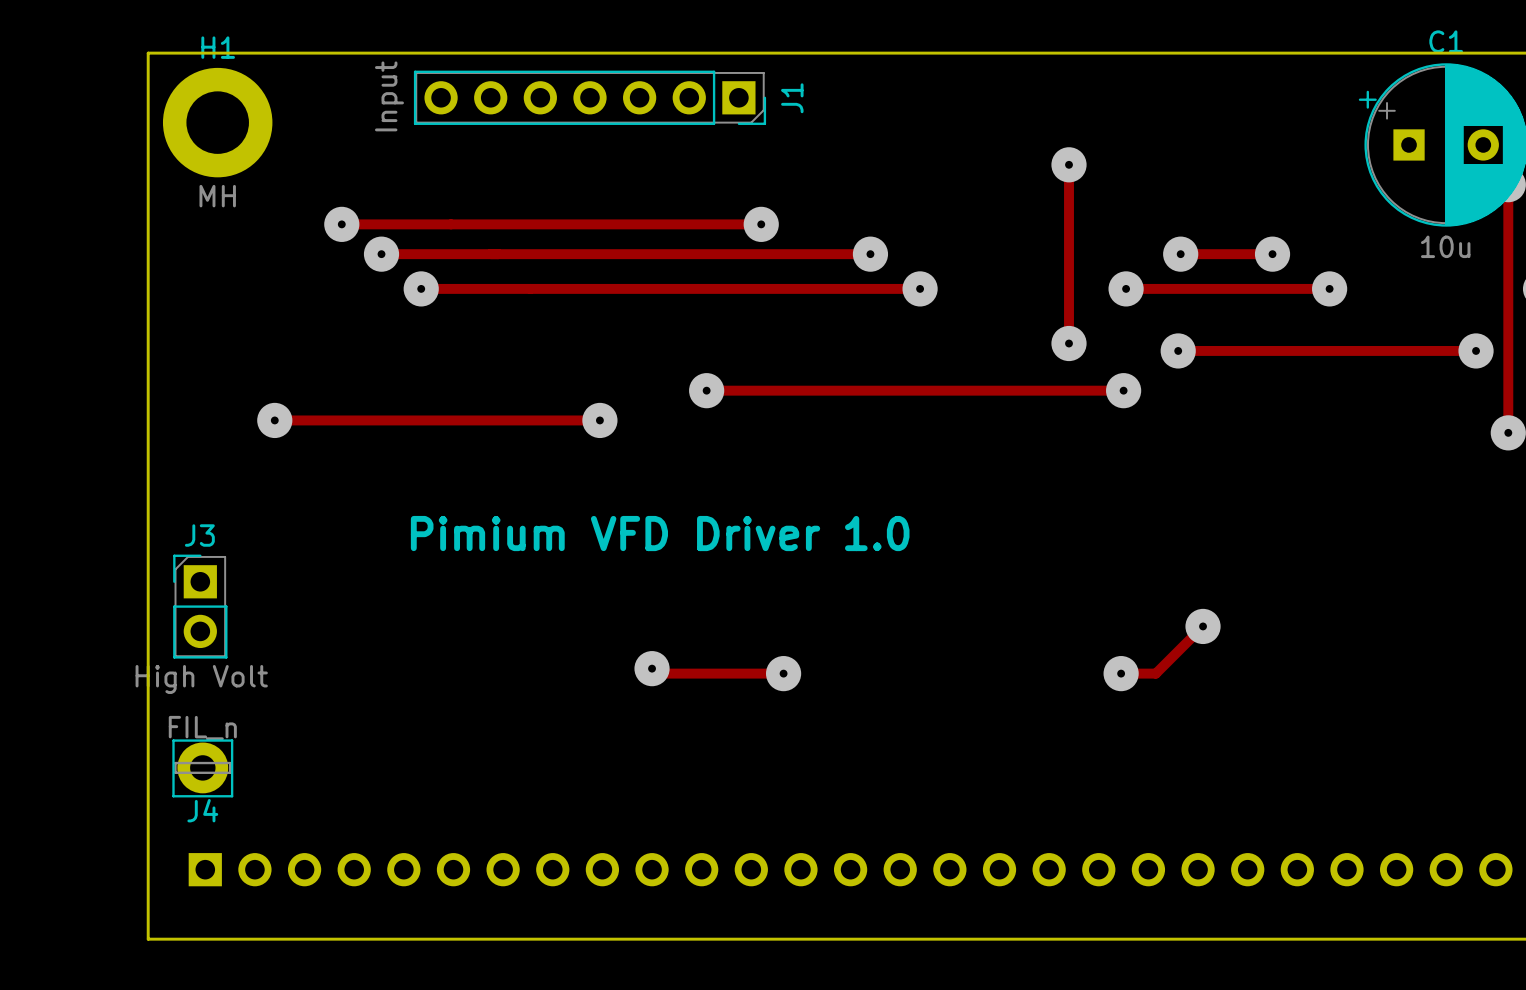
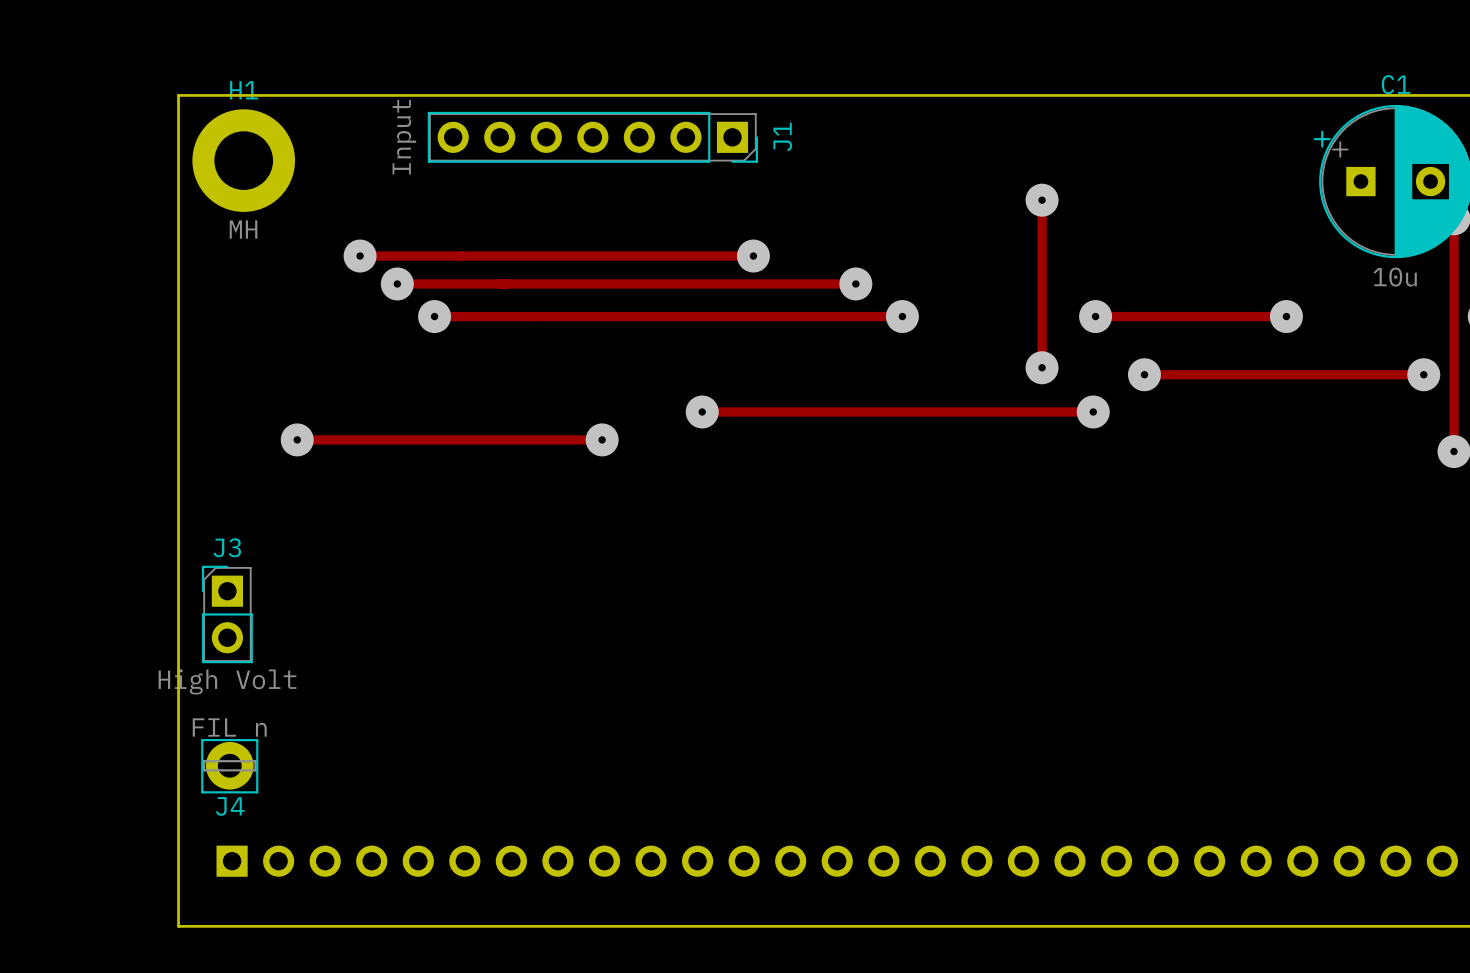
track: (1180, 254) (1272, 254) -> none
via: (1180, 254) -> none
via: (1272, 254) -> none
text: Pimium VFD Driver 1.0 (660, 533) -> none
track: (1203, 626) (1155, 673) (1121, 673) -> none
via: (1203, 626) -> none
track: (644, 661) (657, 673) (783, 673) -> none
via: (652, 668) -> none
via: (783, 673) -> none
via: (1121, 673) -> none

